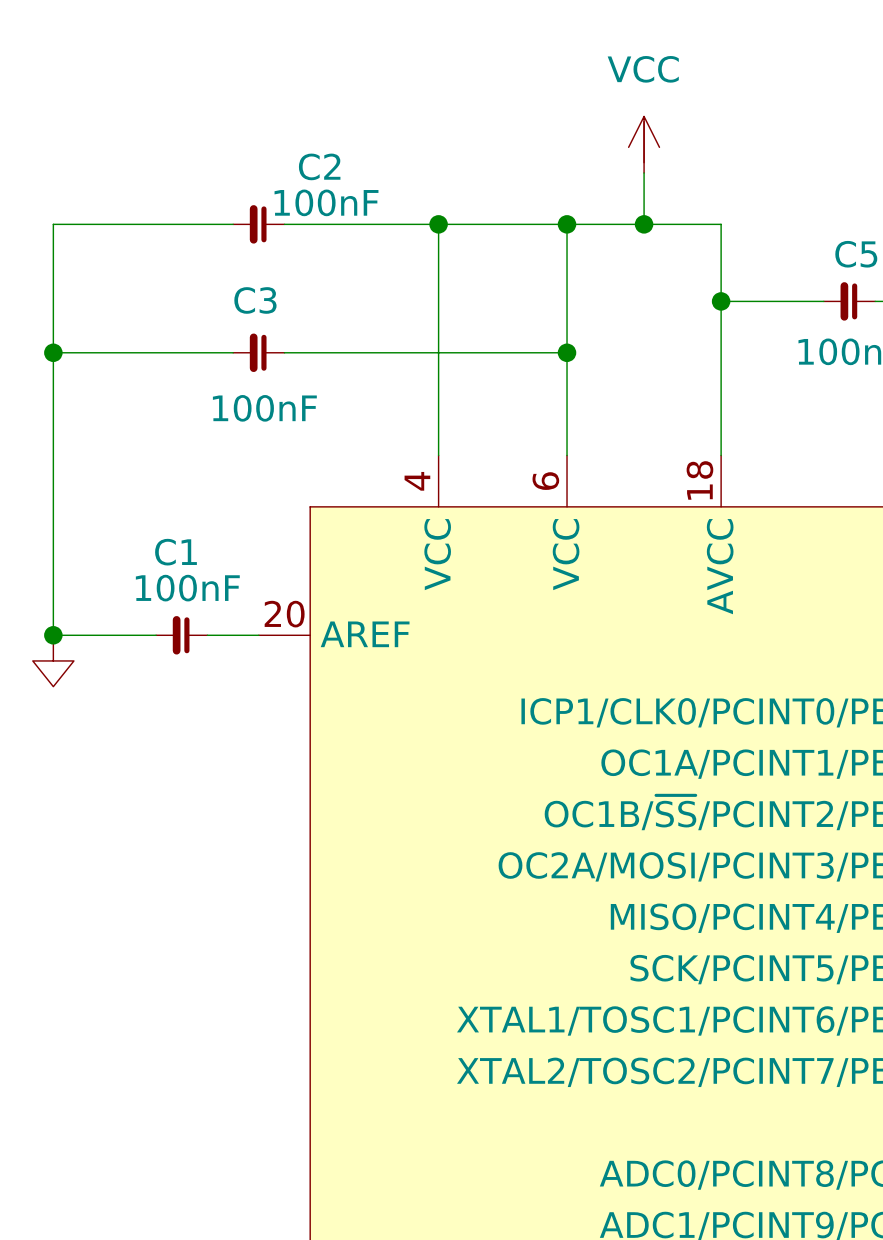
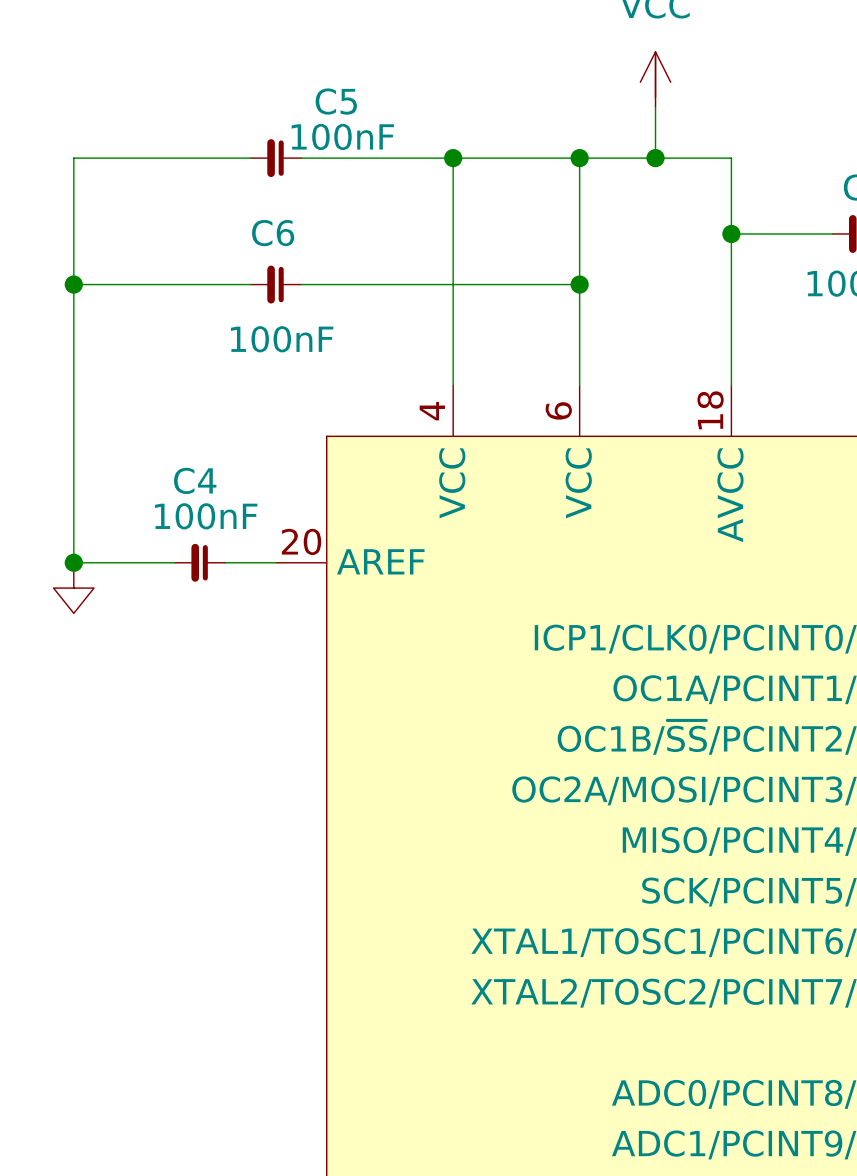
C2 name: C2 (319, 166) -> C5 (336, 101)
C3 name: C3 (255, 300) -> C6 (273, 233)
C1 name: C1 (175, 552) -> C4 (195, 480)

